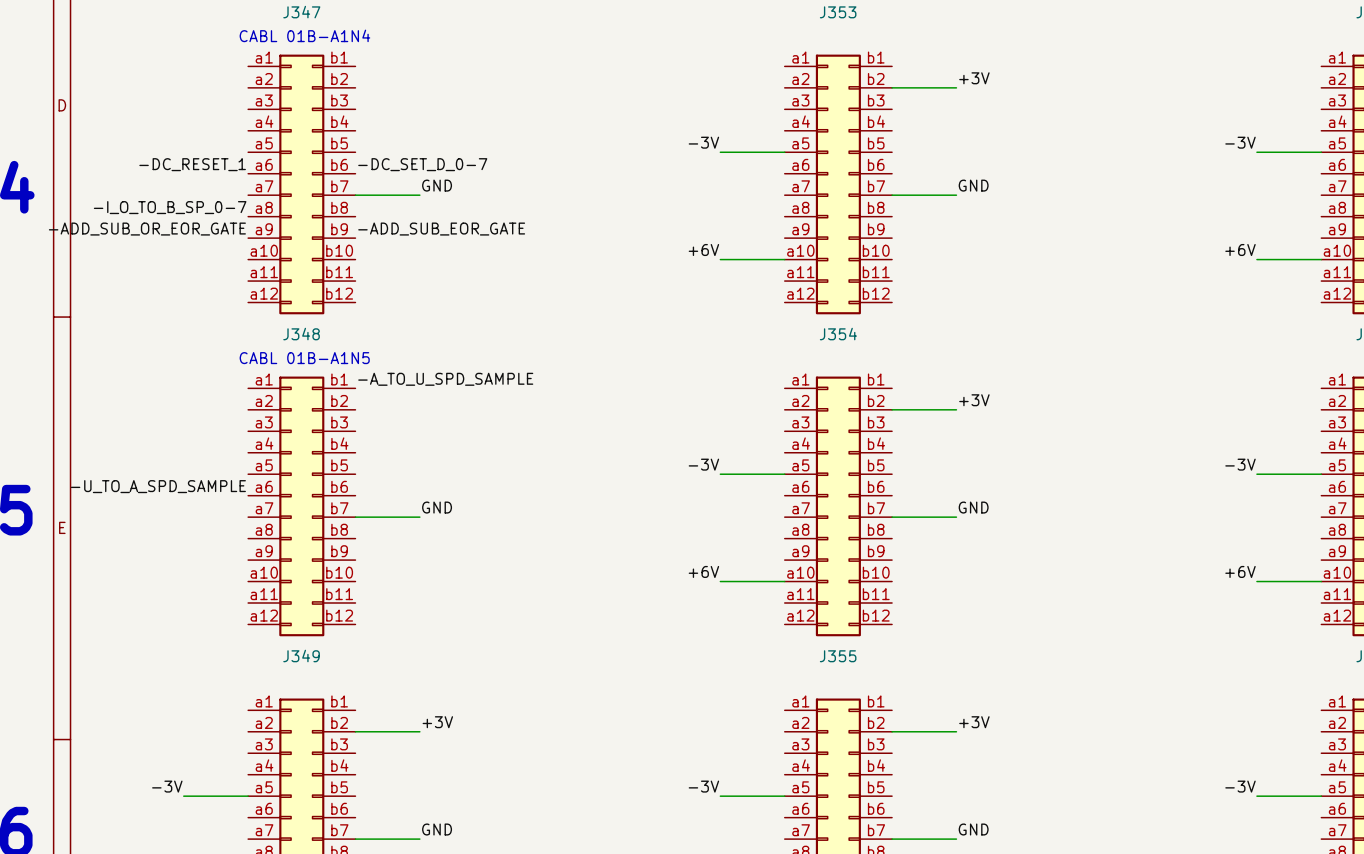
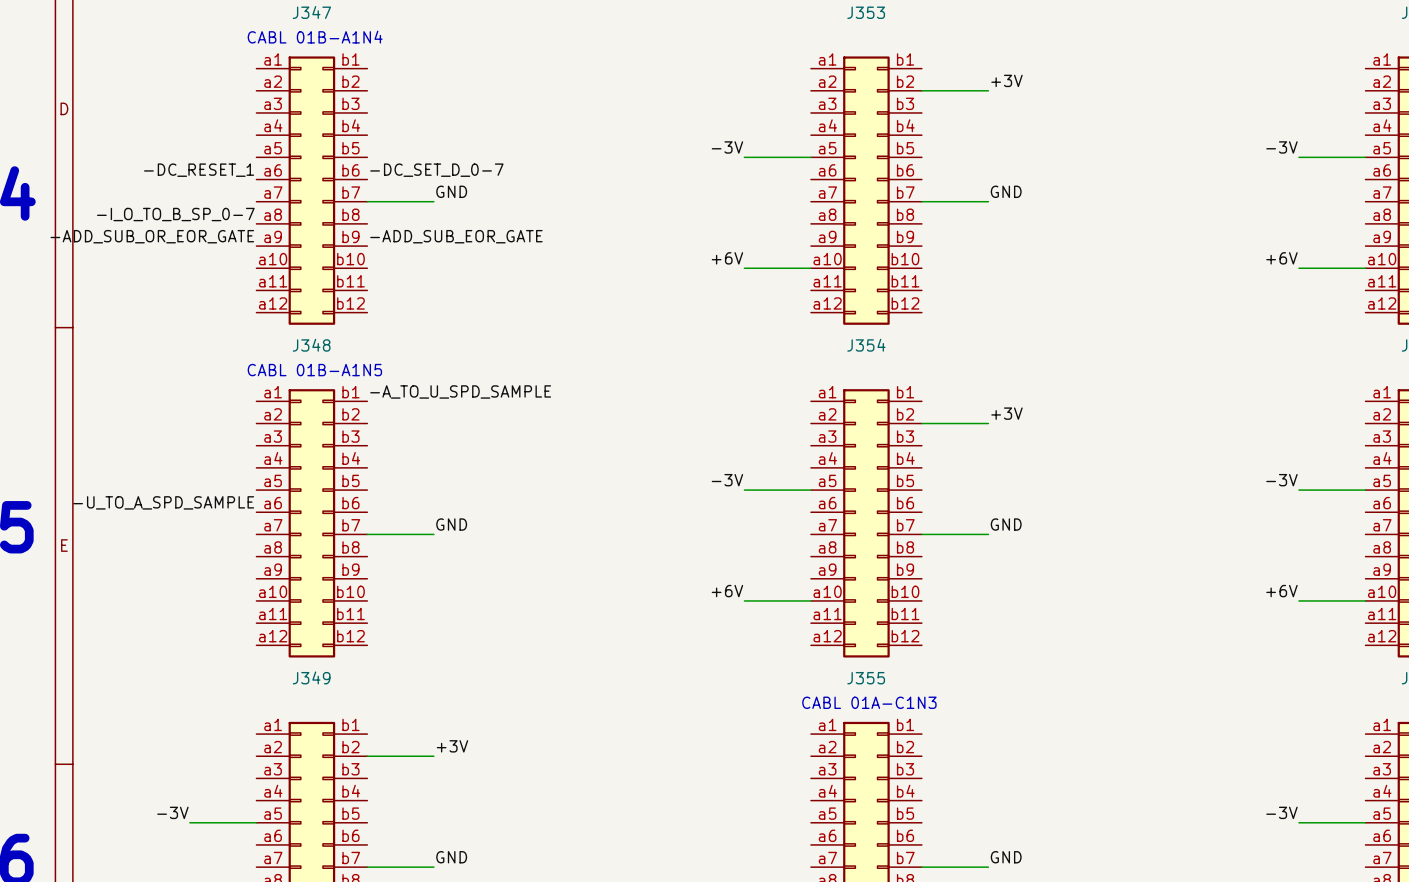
text: none -> CABL 01A-C1N3 (869, 702)
label: +3V (974, 722) -> none
wire: (892, 731) (956, 731) -> none
label: -3V (703, 786) -> none
wire: (720, 796) (784, 796) -> none

